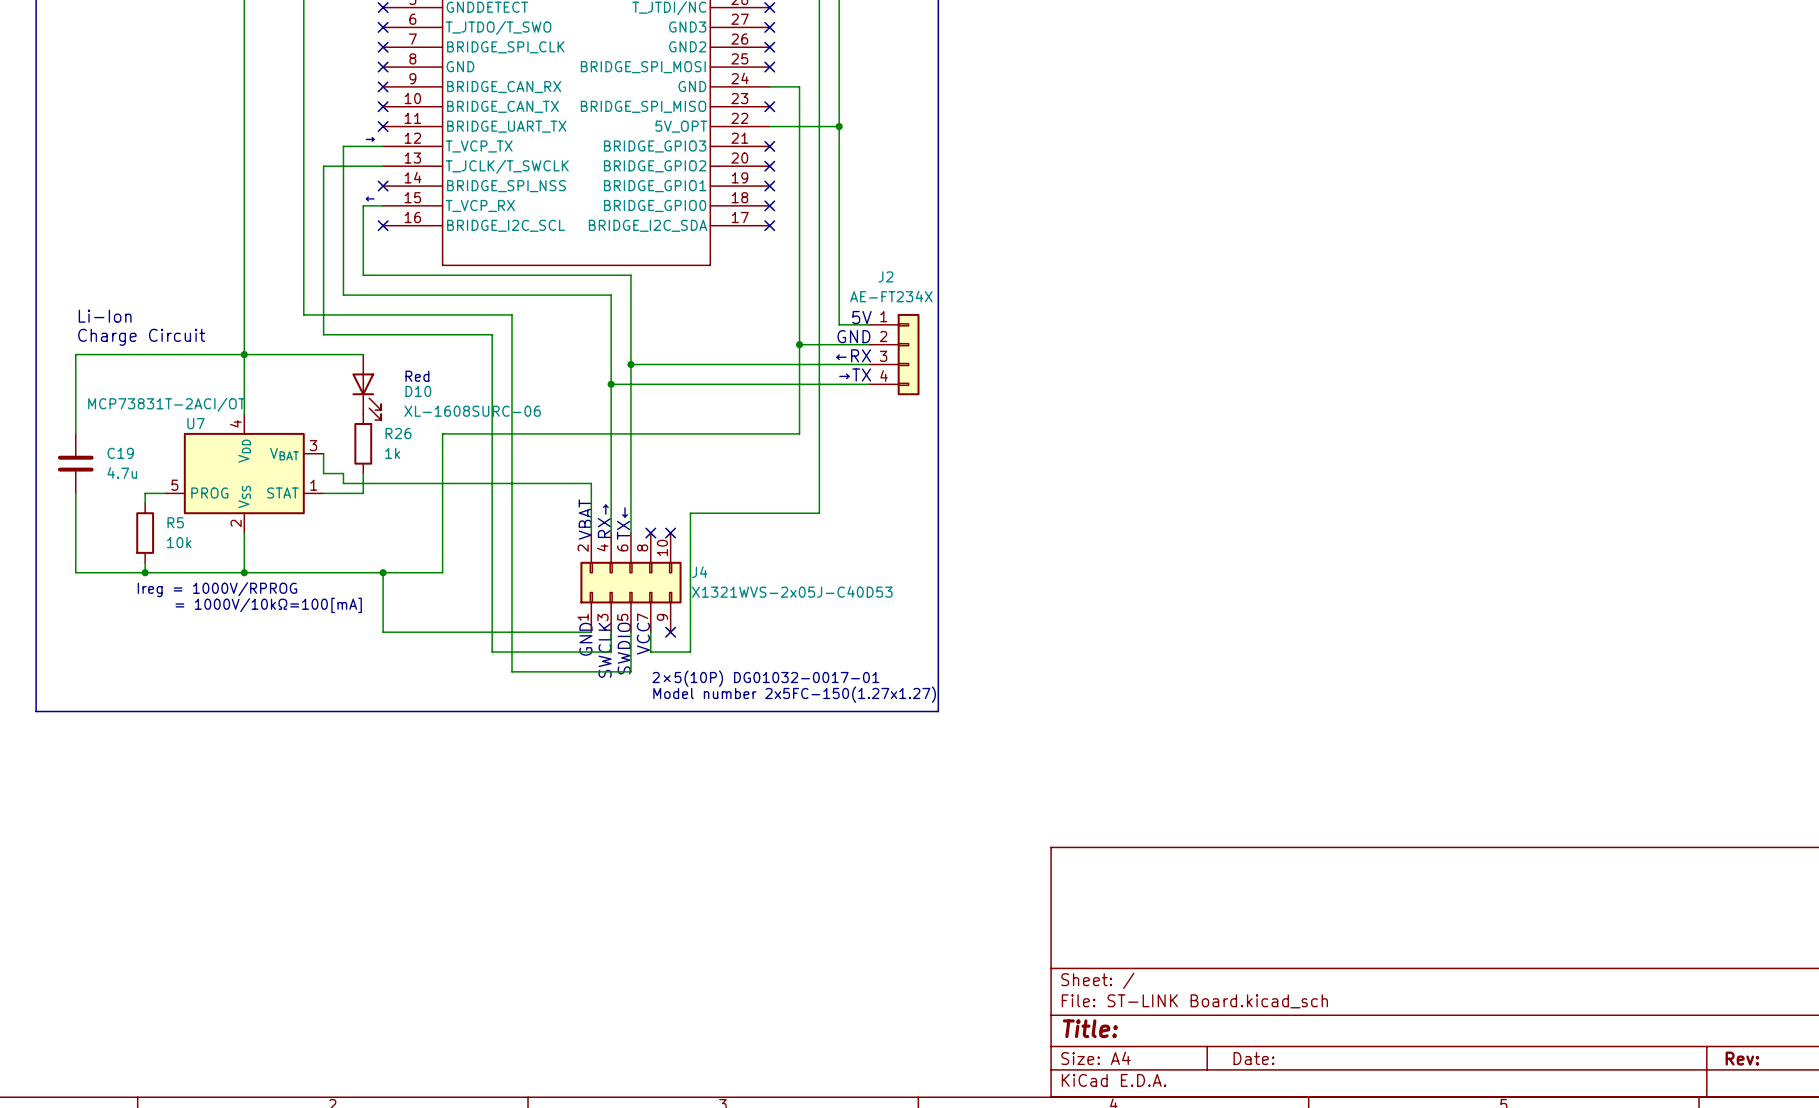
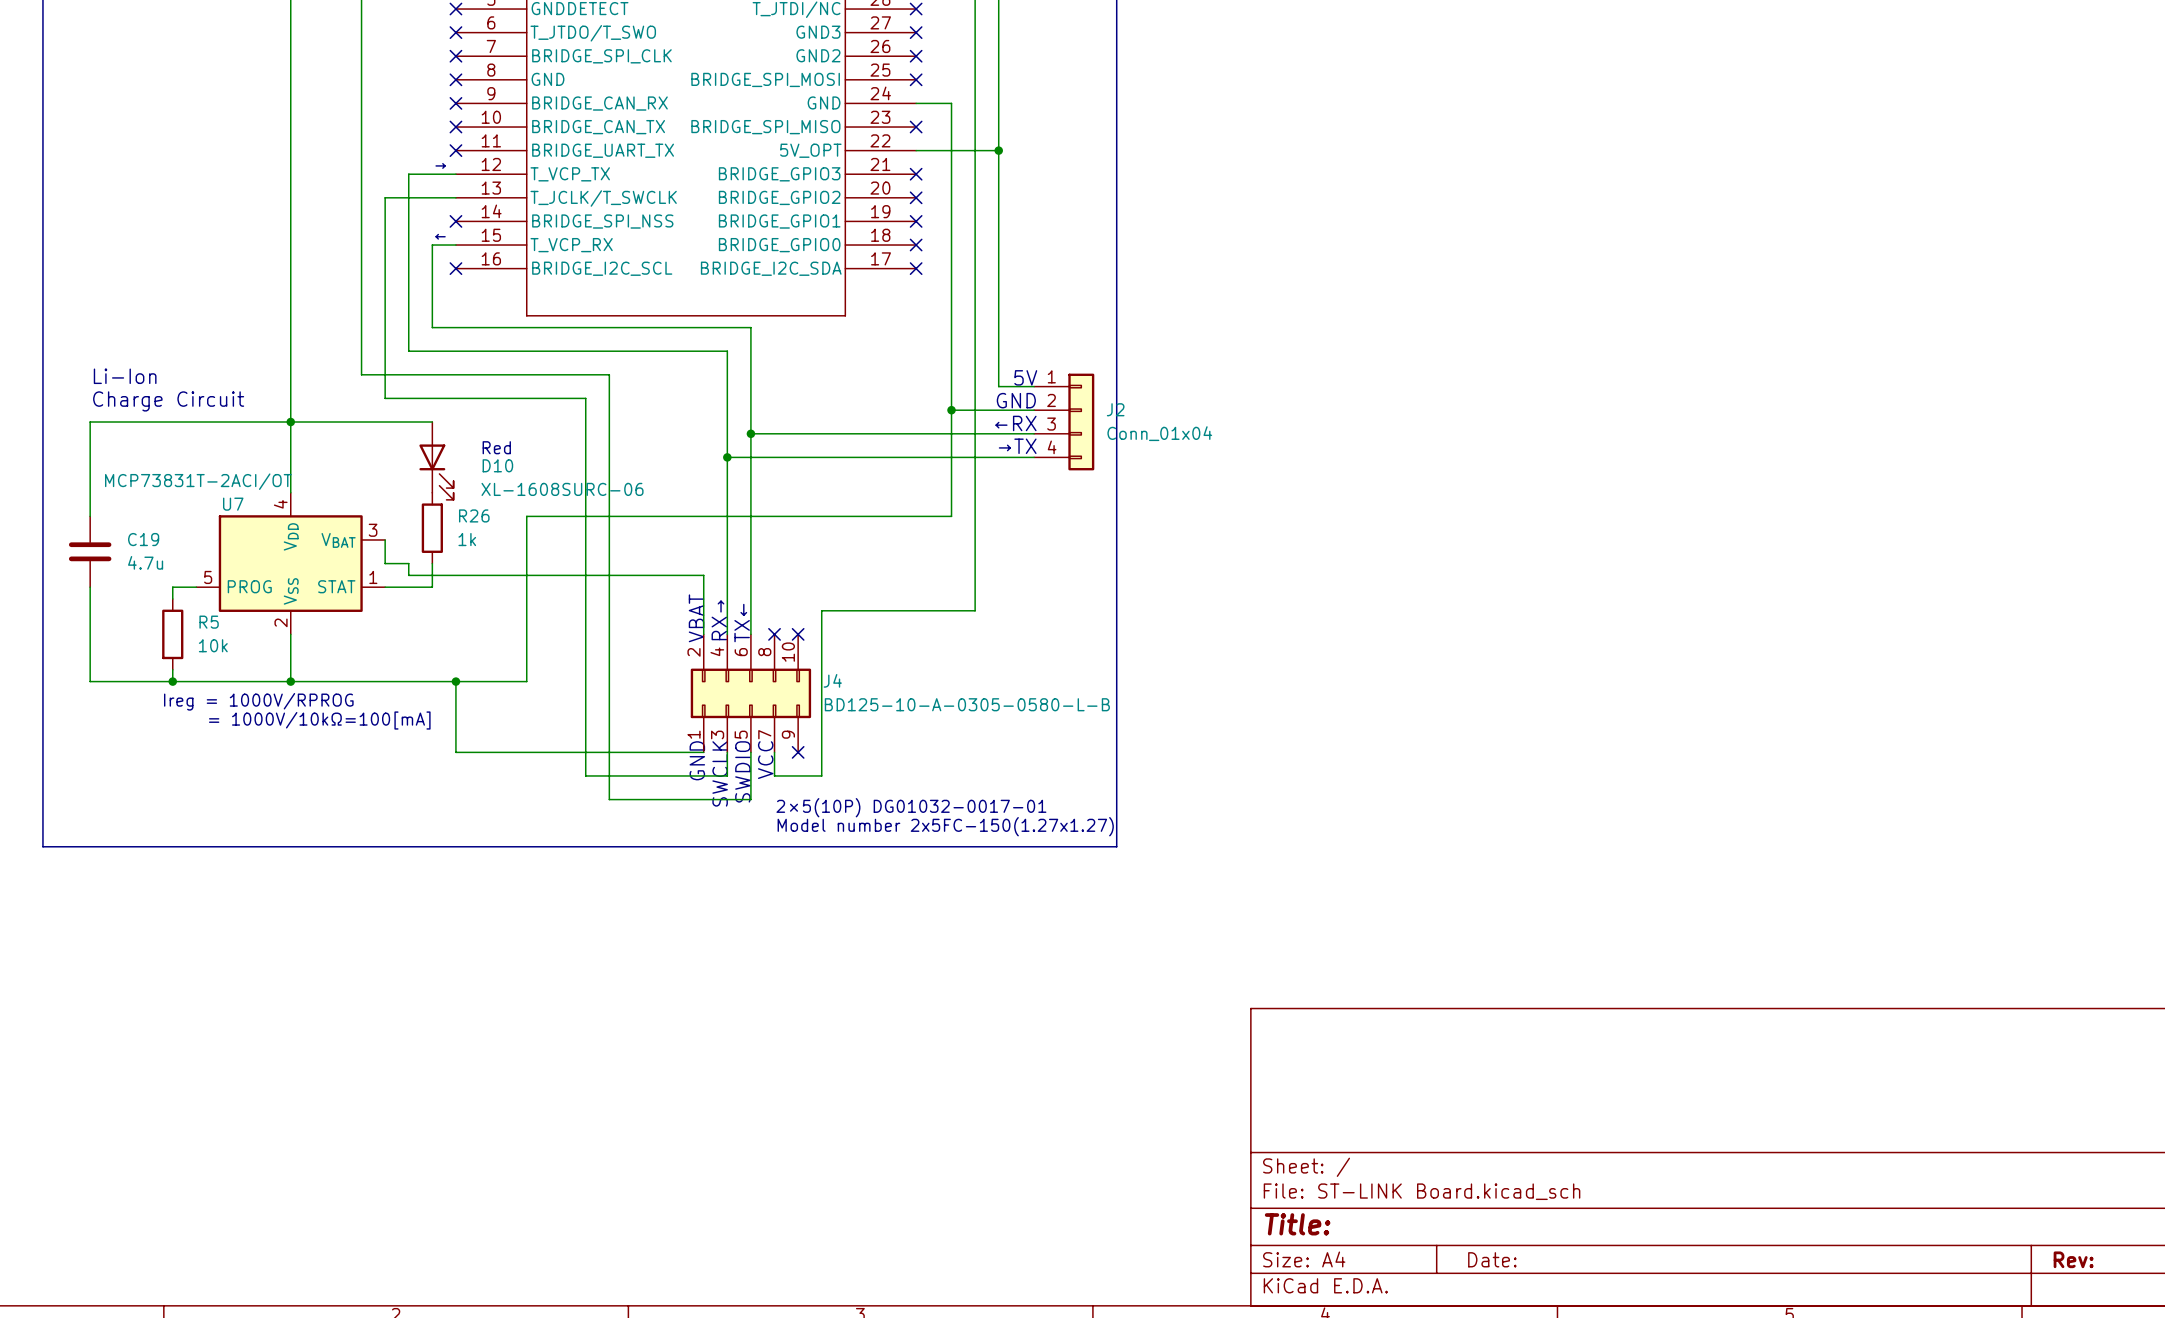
J2 name position: J2 (885, 276) -> J2 (1115, 409)
J2 value: AE-FT234X (891, 296) -> Conn_01x04 (1159, 433)
J4 value: X1321WVS-2x05J-C40D53 (792, 591) -> BD125-10-A-0305-0580-L-B (967, 704)

